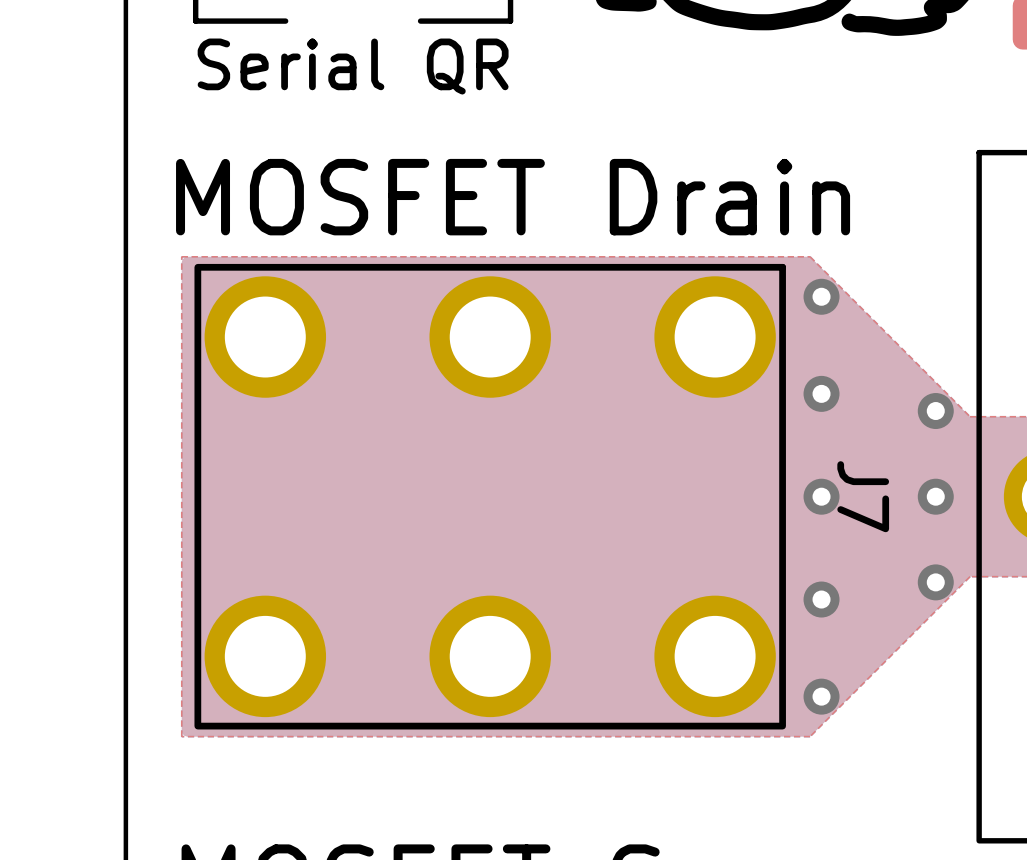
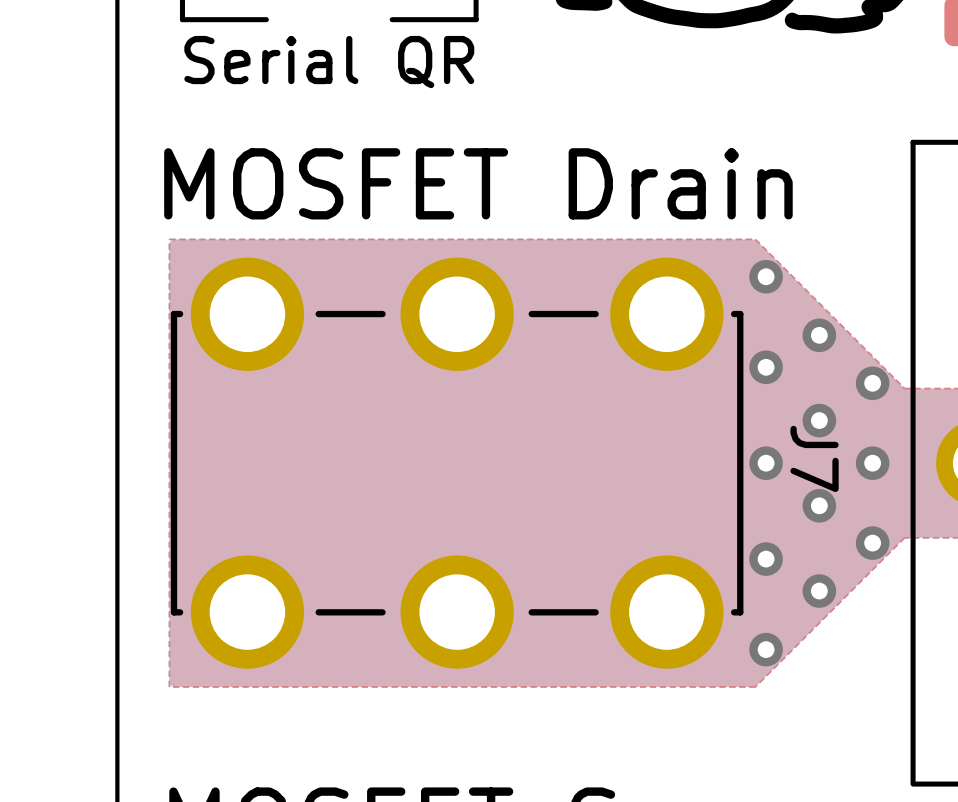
J7 footprint: [194, 263, 786, 730] -> [170, 257, 744, 669]
via: none -> (819, 335)
via: none -> (819, 420)
via: none -> (819, 505)
via: none -> (819, 591)

